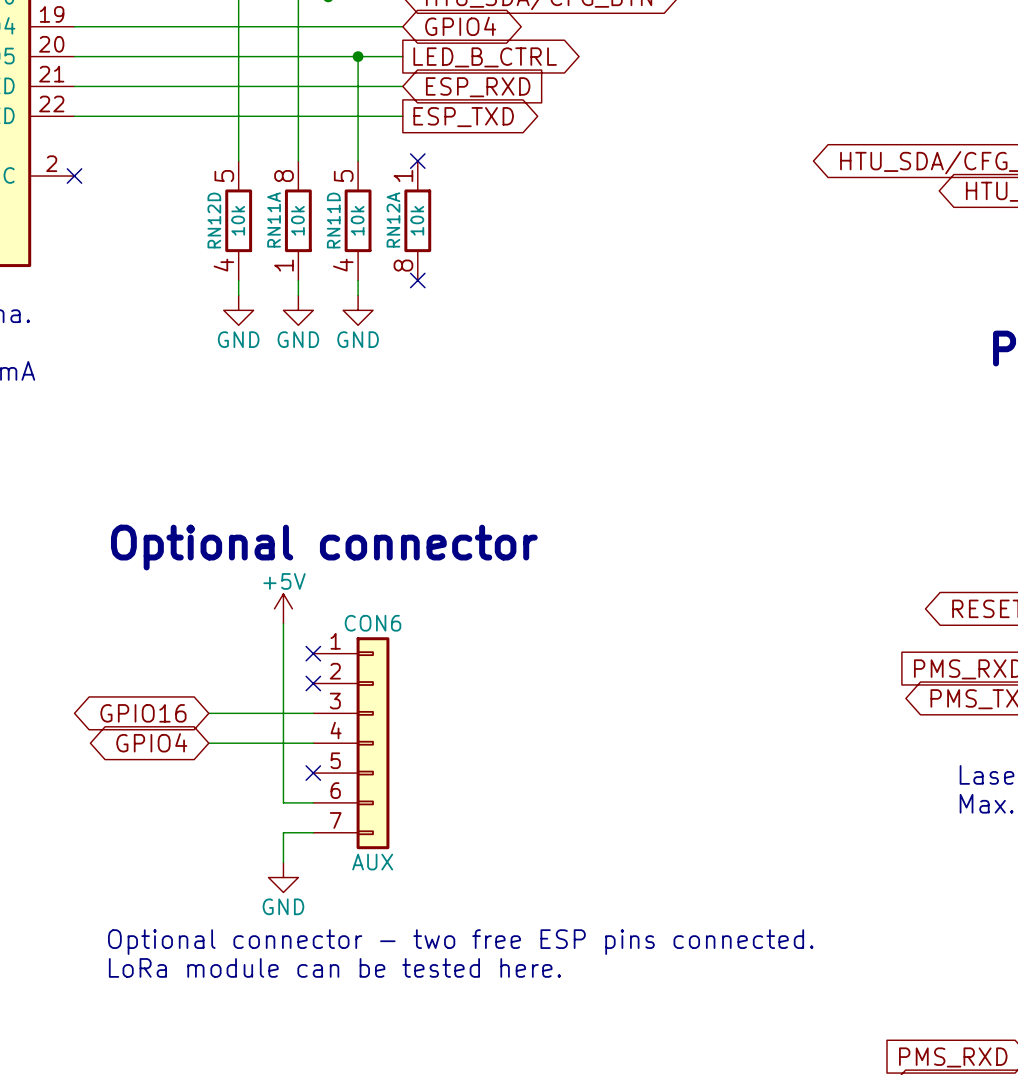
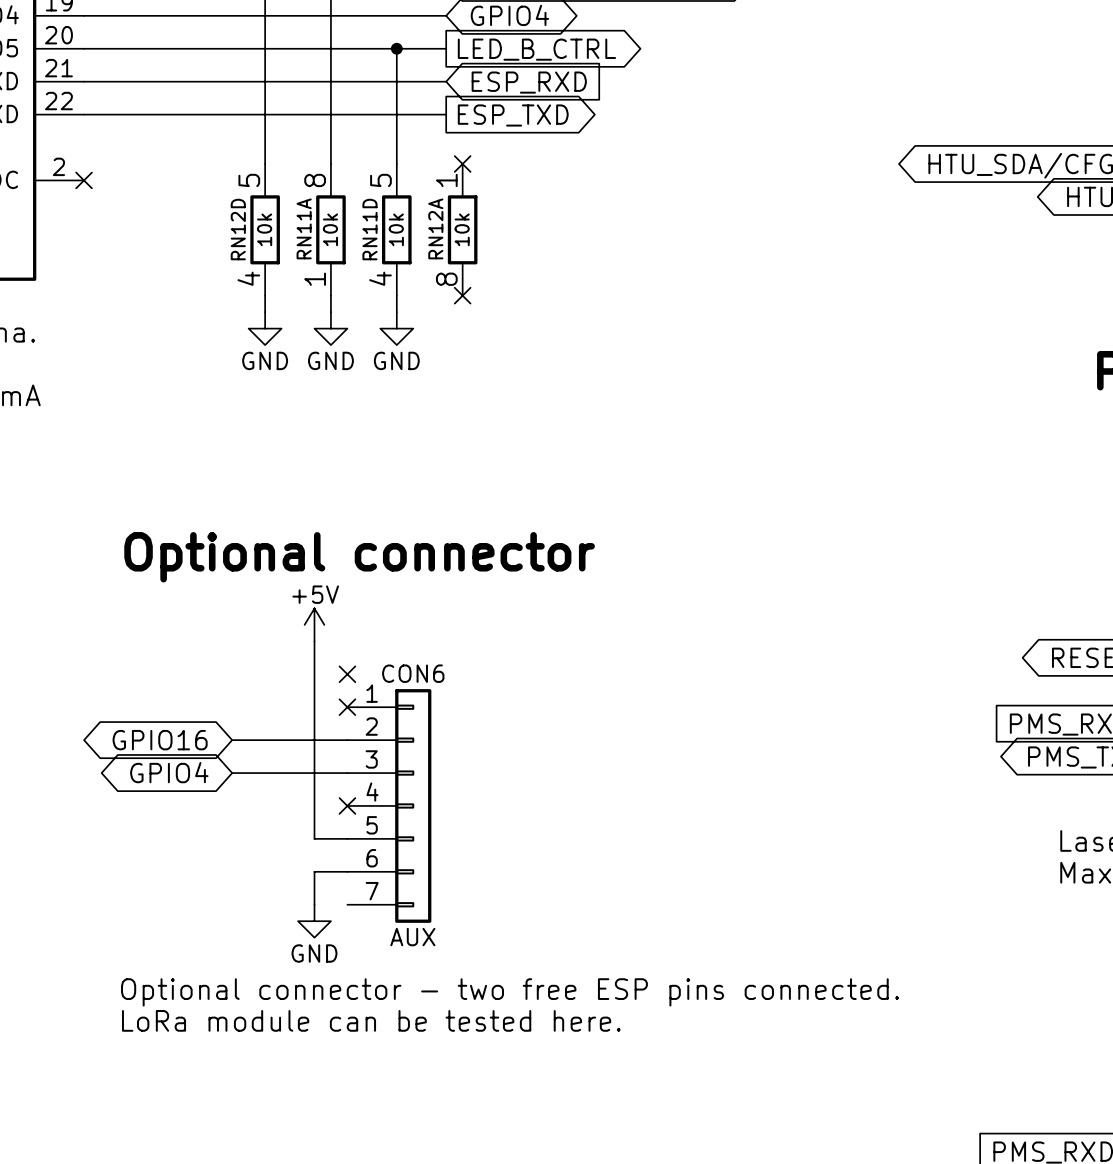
text position: Optional connector (324, 547) -> Optional connector (359, 557)
power symbol position: +5V (283, 608) -> +5V (314, 624)
no-connect mark: none -> (347, 674)
global label: none -> GPIO16 (160, 740)
no-connect mark: (313, 683) -> none
global label: GPIO16 (143, 713) -> GPIO4 (169, 772)
global label: GPIO4 (151, 742) -> none
wire: (208, 743) (313, 743) -> (232, 740) (347, 740)
no-connect mark: none -> (347, 805)
wire: (283, 773) (283, 802) -> (314, 838) (347, 838)
no-connect mark: (313, 773) -> none
wire: none -> (314, 871) (314, 904)
wire: (313, 832) (283, 832) (283, 862) -> none
power symbol position: GND (283, 877) -> GND (314, 921)
text: none -> Optional connector - two free ESP pins connected. (510, 992)
text: Optional connector - two free ESP pins connected. (460, 942) -> LoRa module can be tested here. (371, 1020)
text: LoRa module can be tested here. (334, 967) -> none

